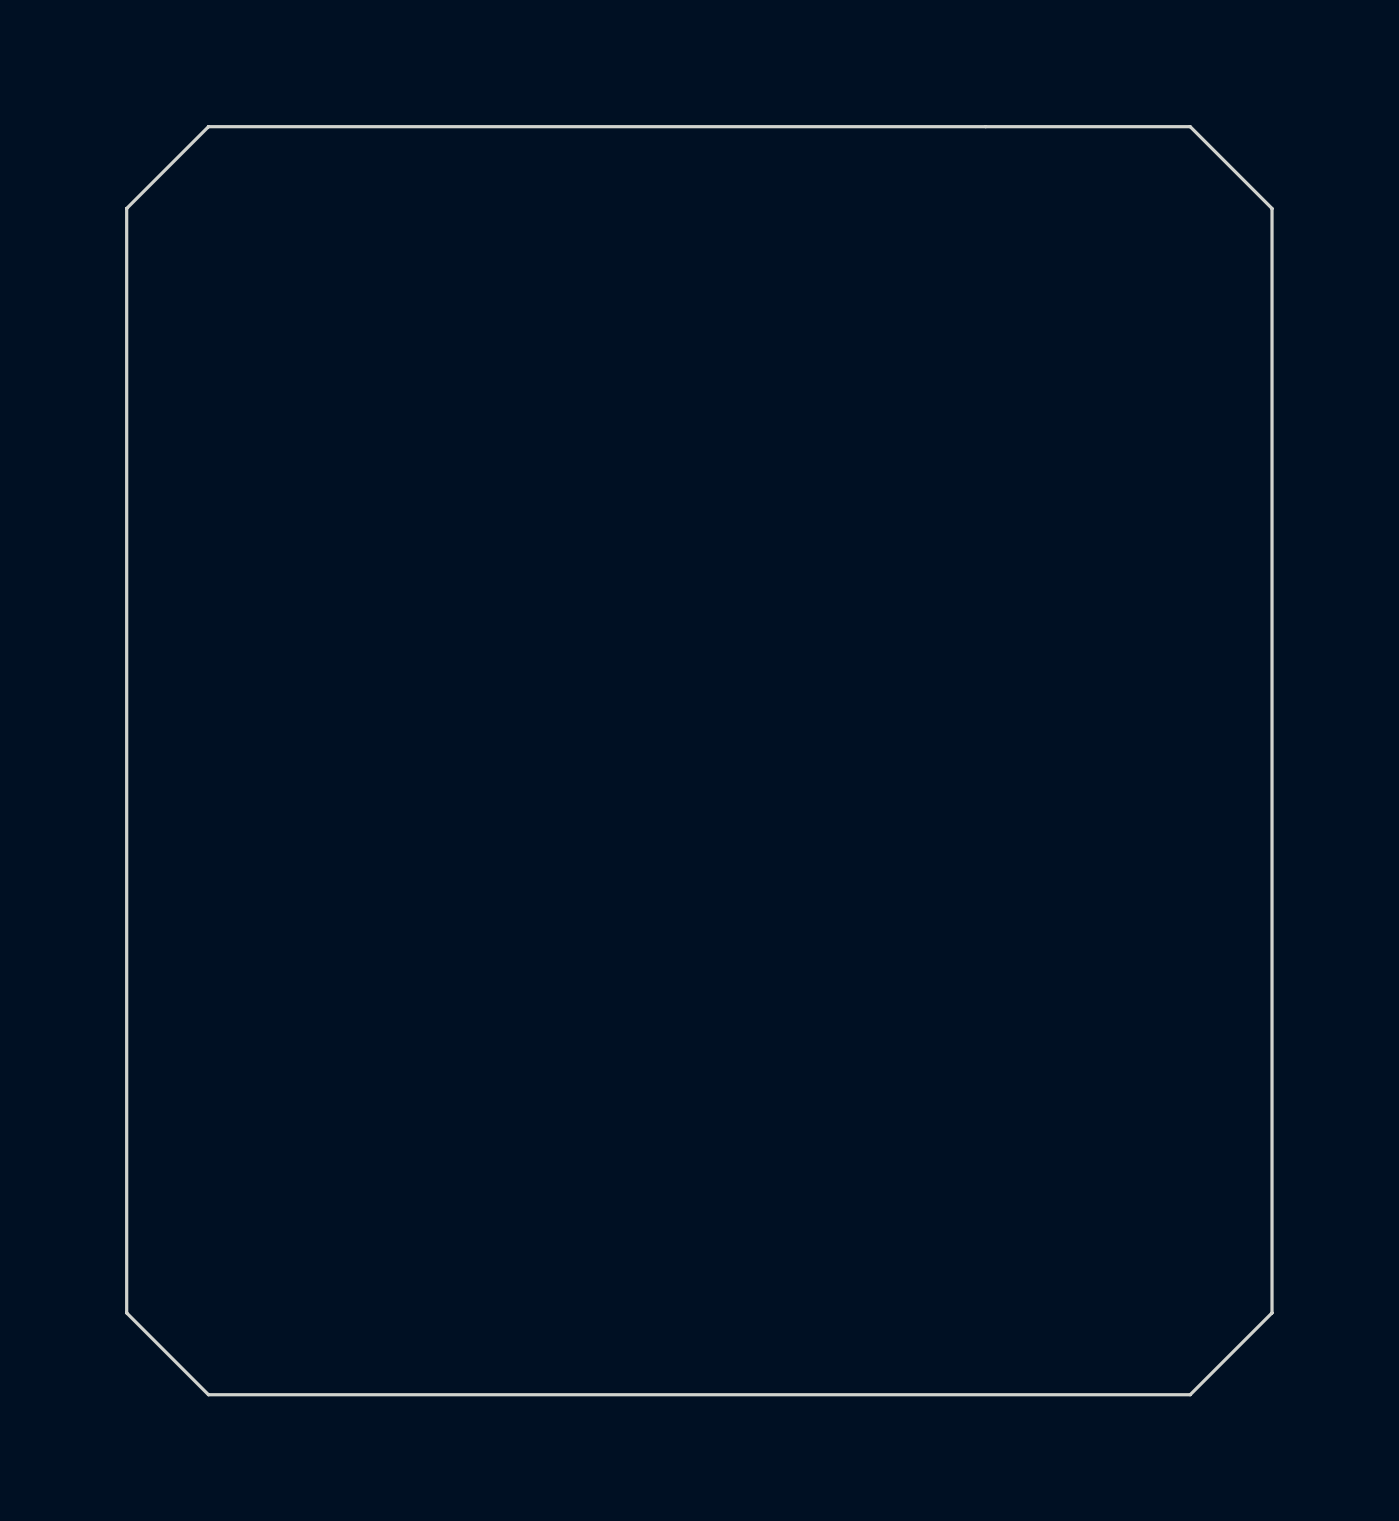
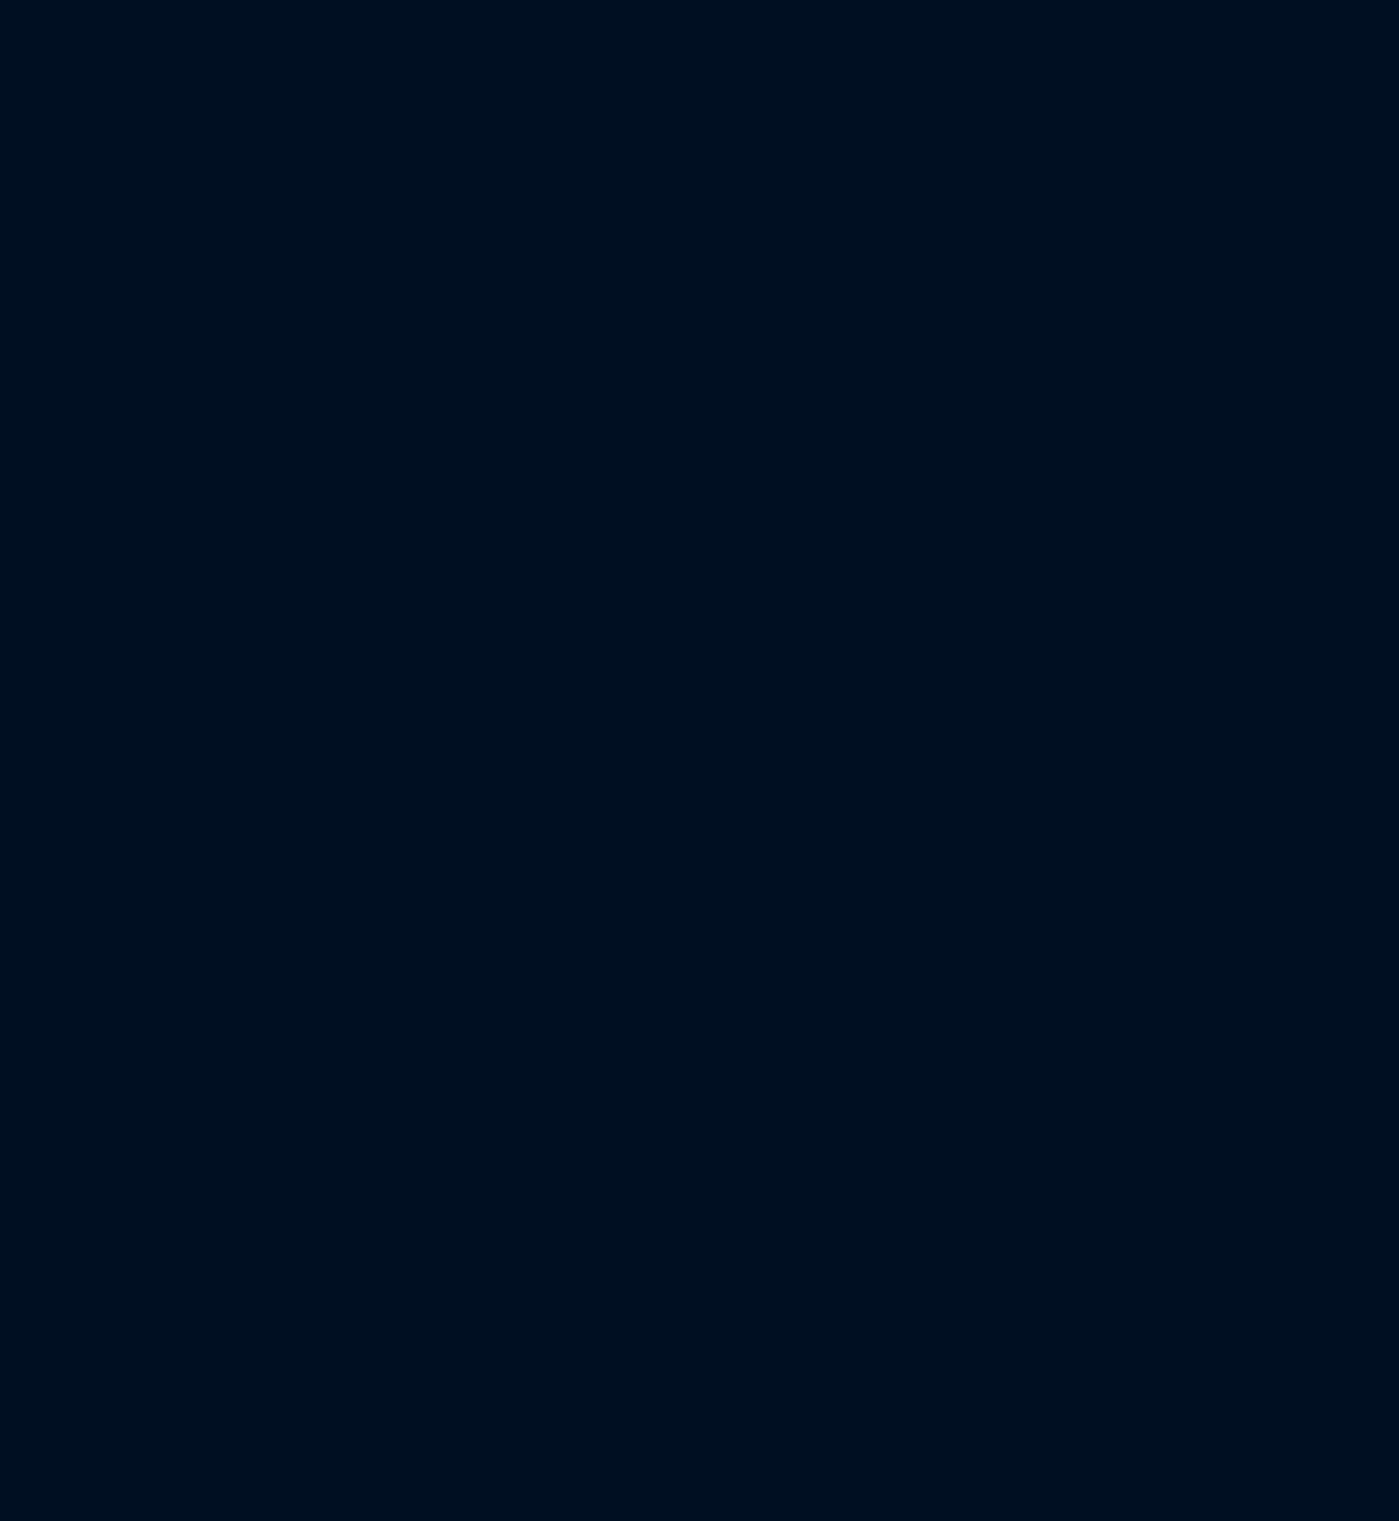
board edge: (1190, 126) (208, 126) (126, 208) (126, 1312) (208, 1394) (1190, 1394) (1272, 1312) (1272, 208) (1190, 126) -> none

